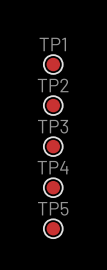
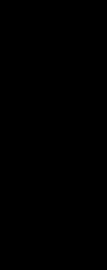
TP1: (53, 64) -> none
TP2: (53, 105) -> none
TP3: (53, 146) -> none
TP4: (53, 187) -> none
TP5: (53, 228) -> none

